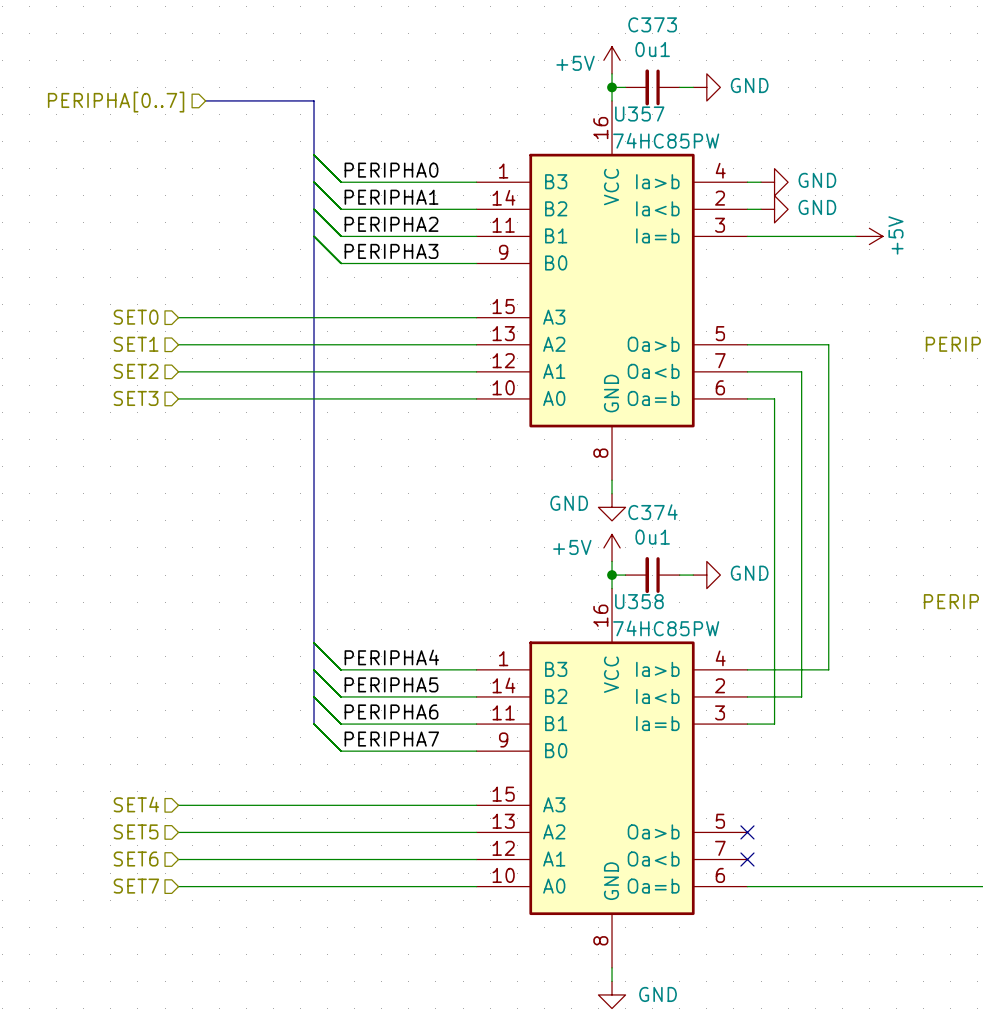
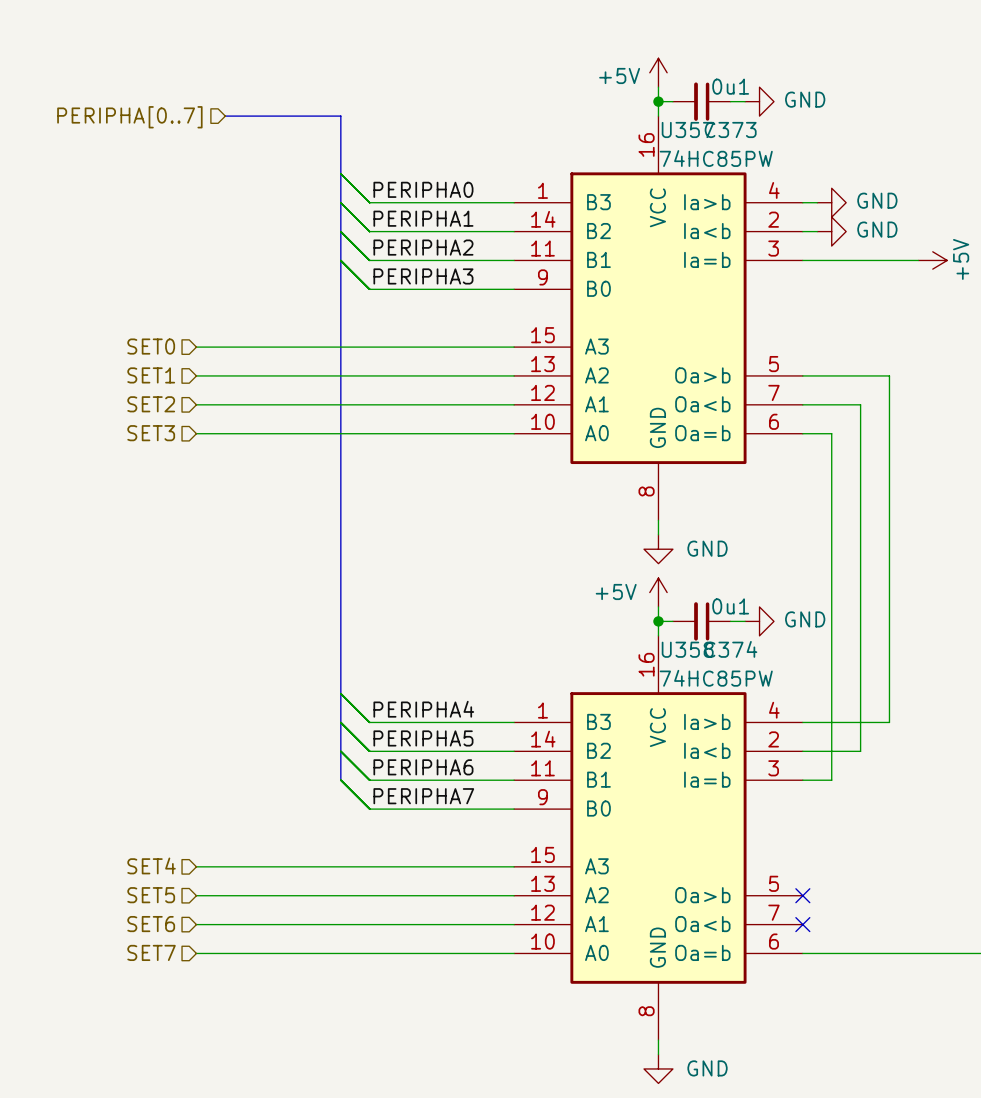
C373 name position: C373 (652, 24) -> C373 (730, 129)
C373 value position: 0u1 (652, 49) -> 0u1 (730, 86)
power symbol text position: GND (569, 503) -> GND (707, 548)
C374 name position: C374 (652, 512) -> C374 (731, 649)
C374 value position: 0u1 (652, 537) -> 0u1 (730, 606)

